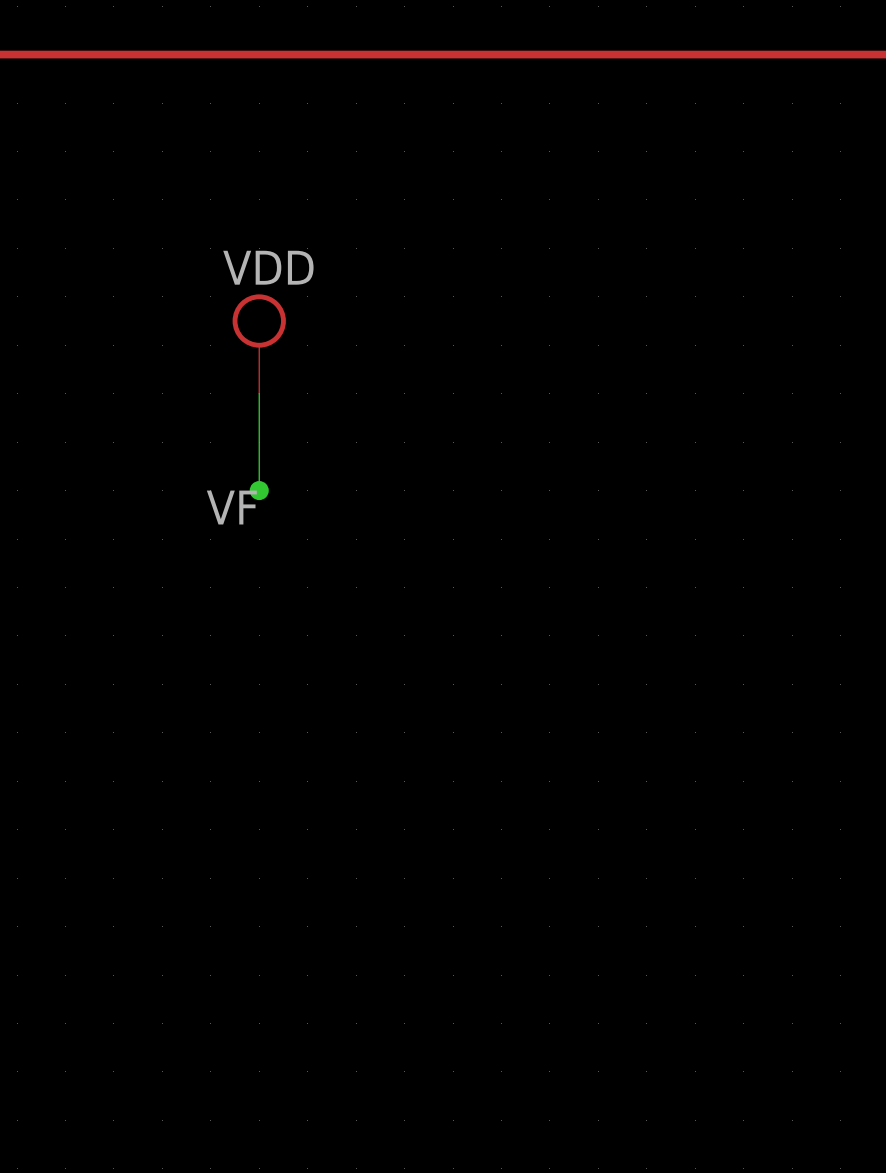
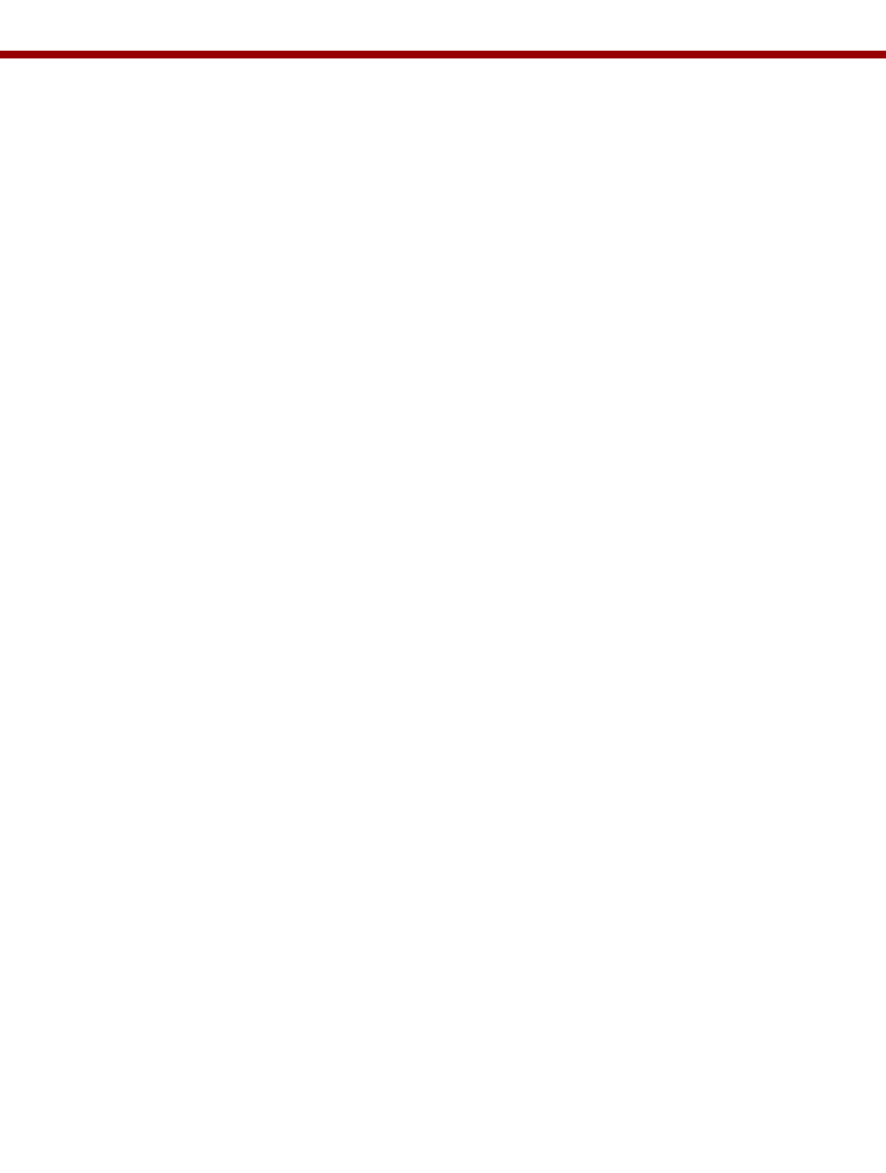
power symbol: VDD (259, 344) -> none
wire: (259, 393) (259, 490) -> none
junction: (259, 490) -> none
label: VF (231, 507) -> none

